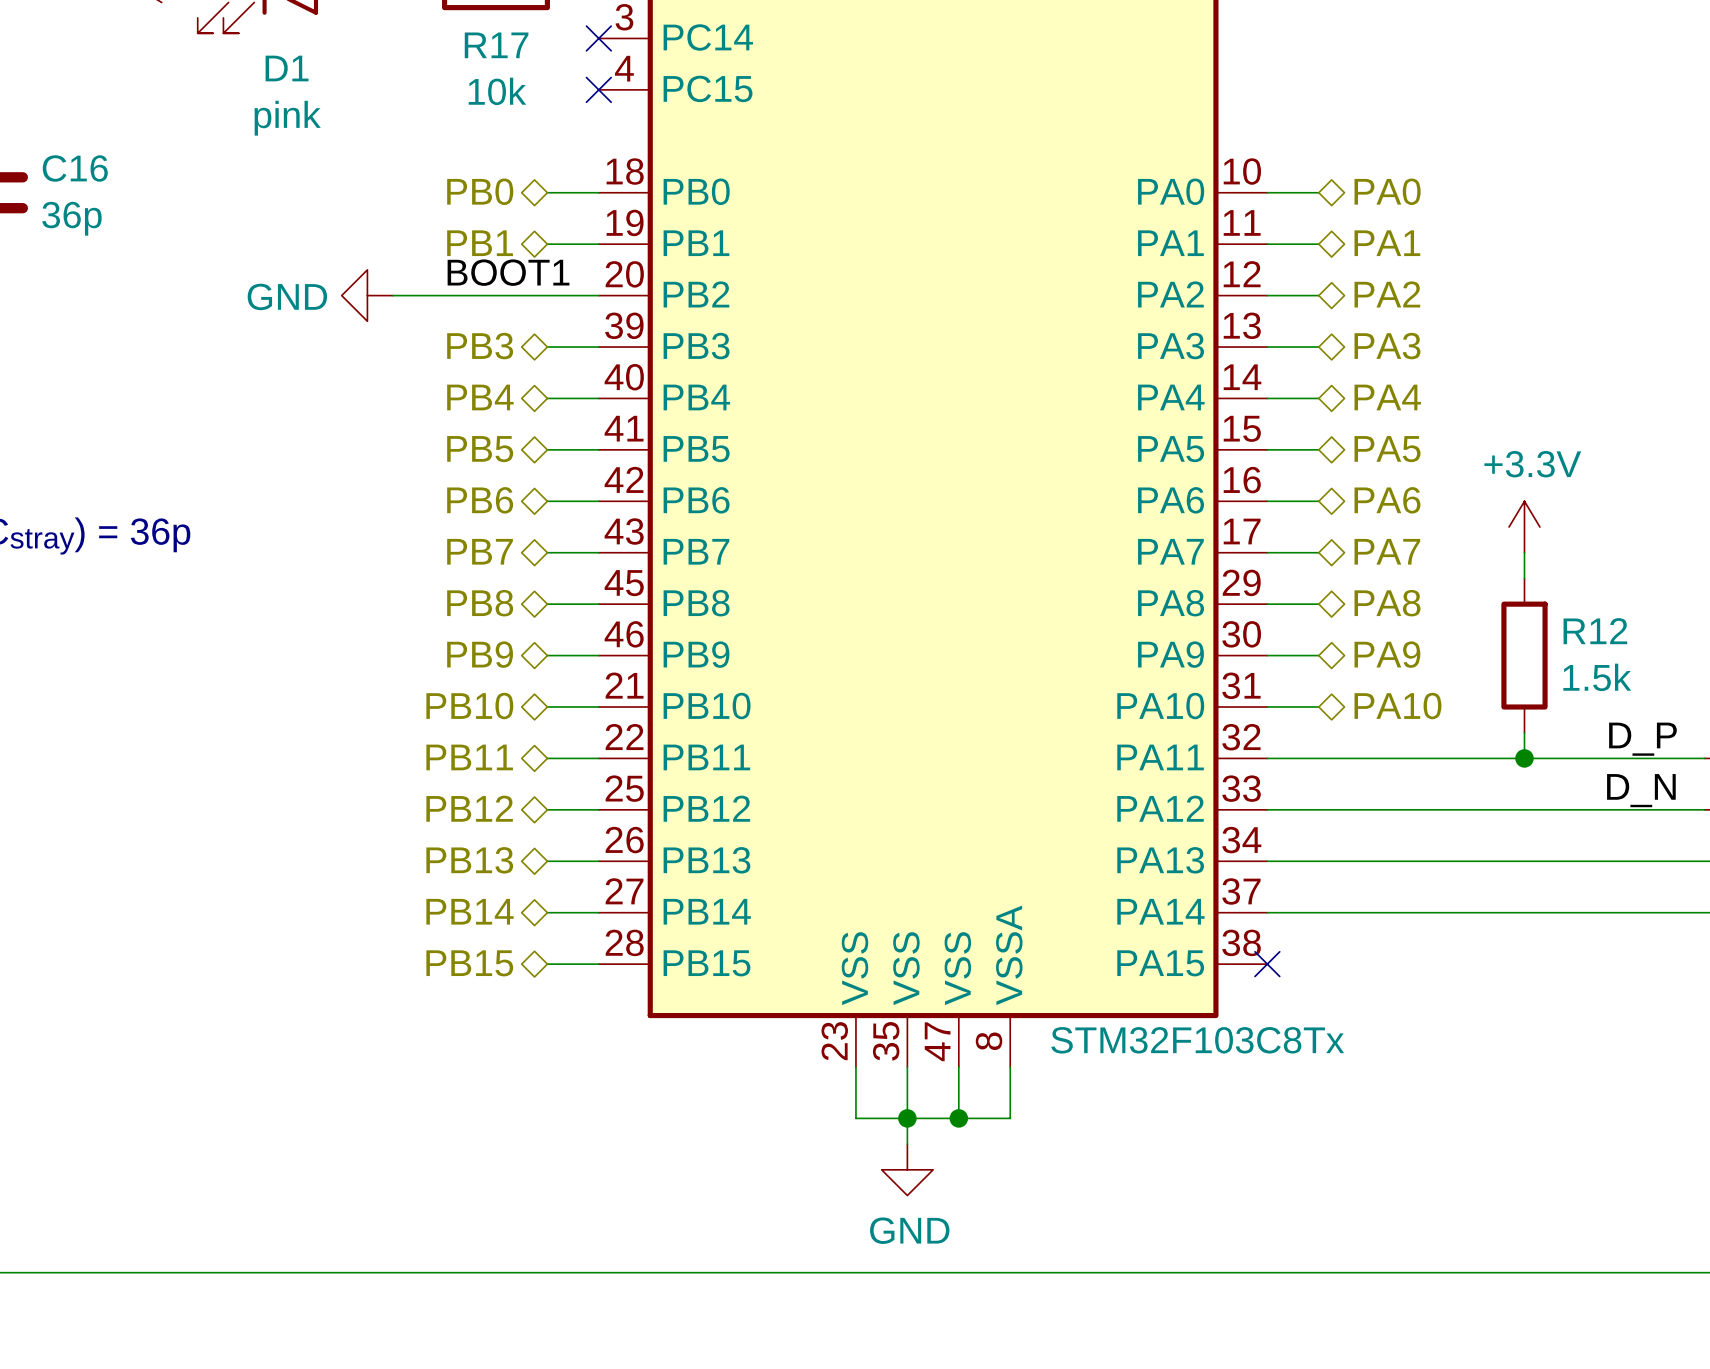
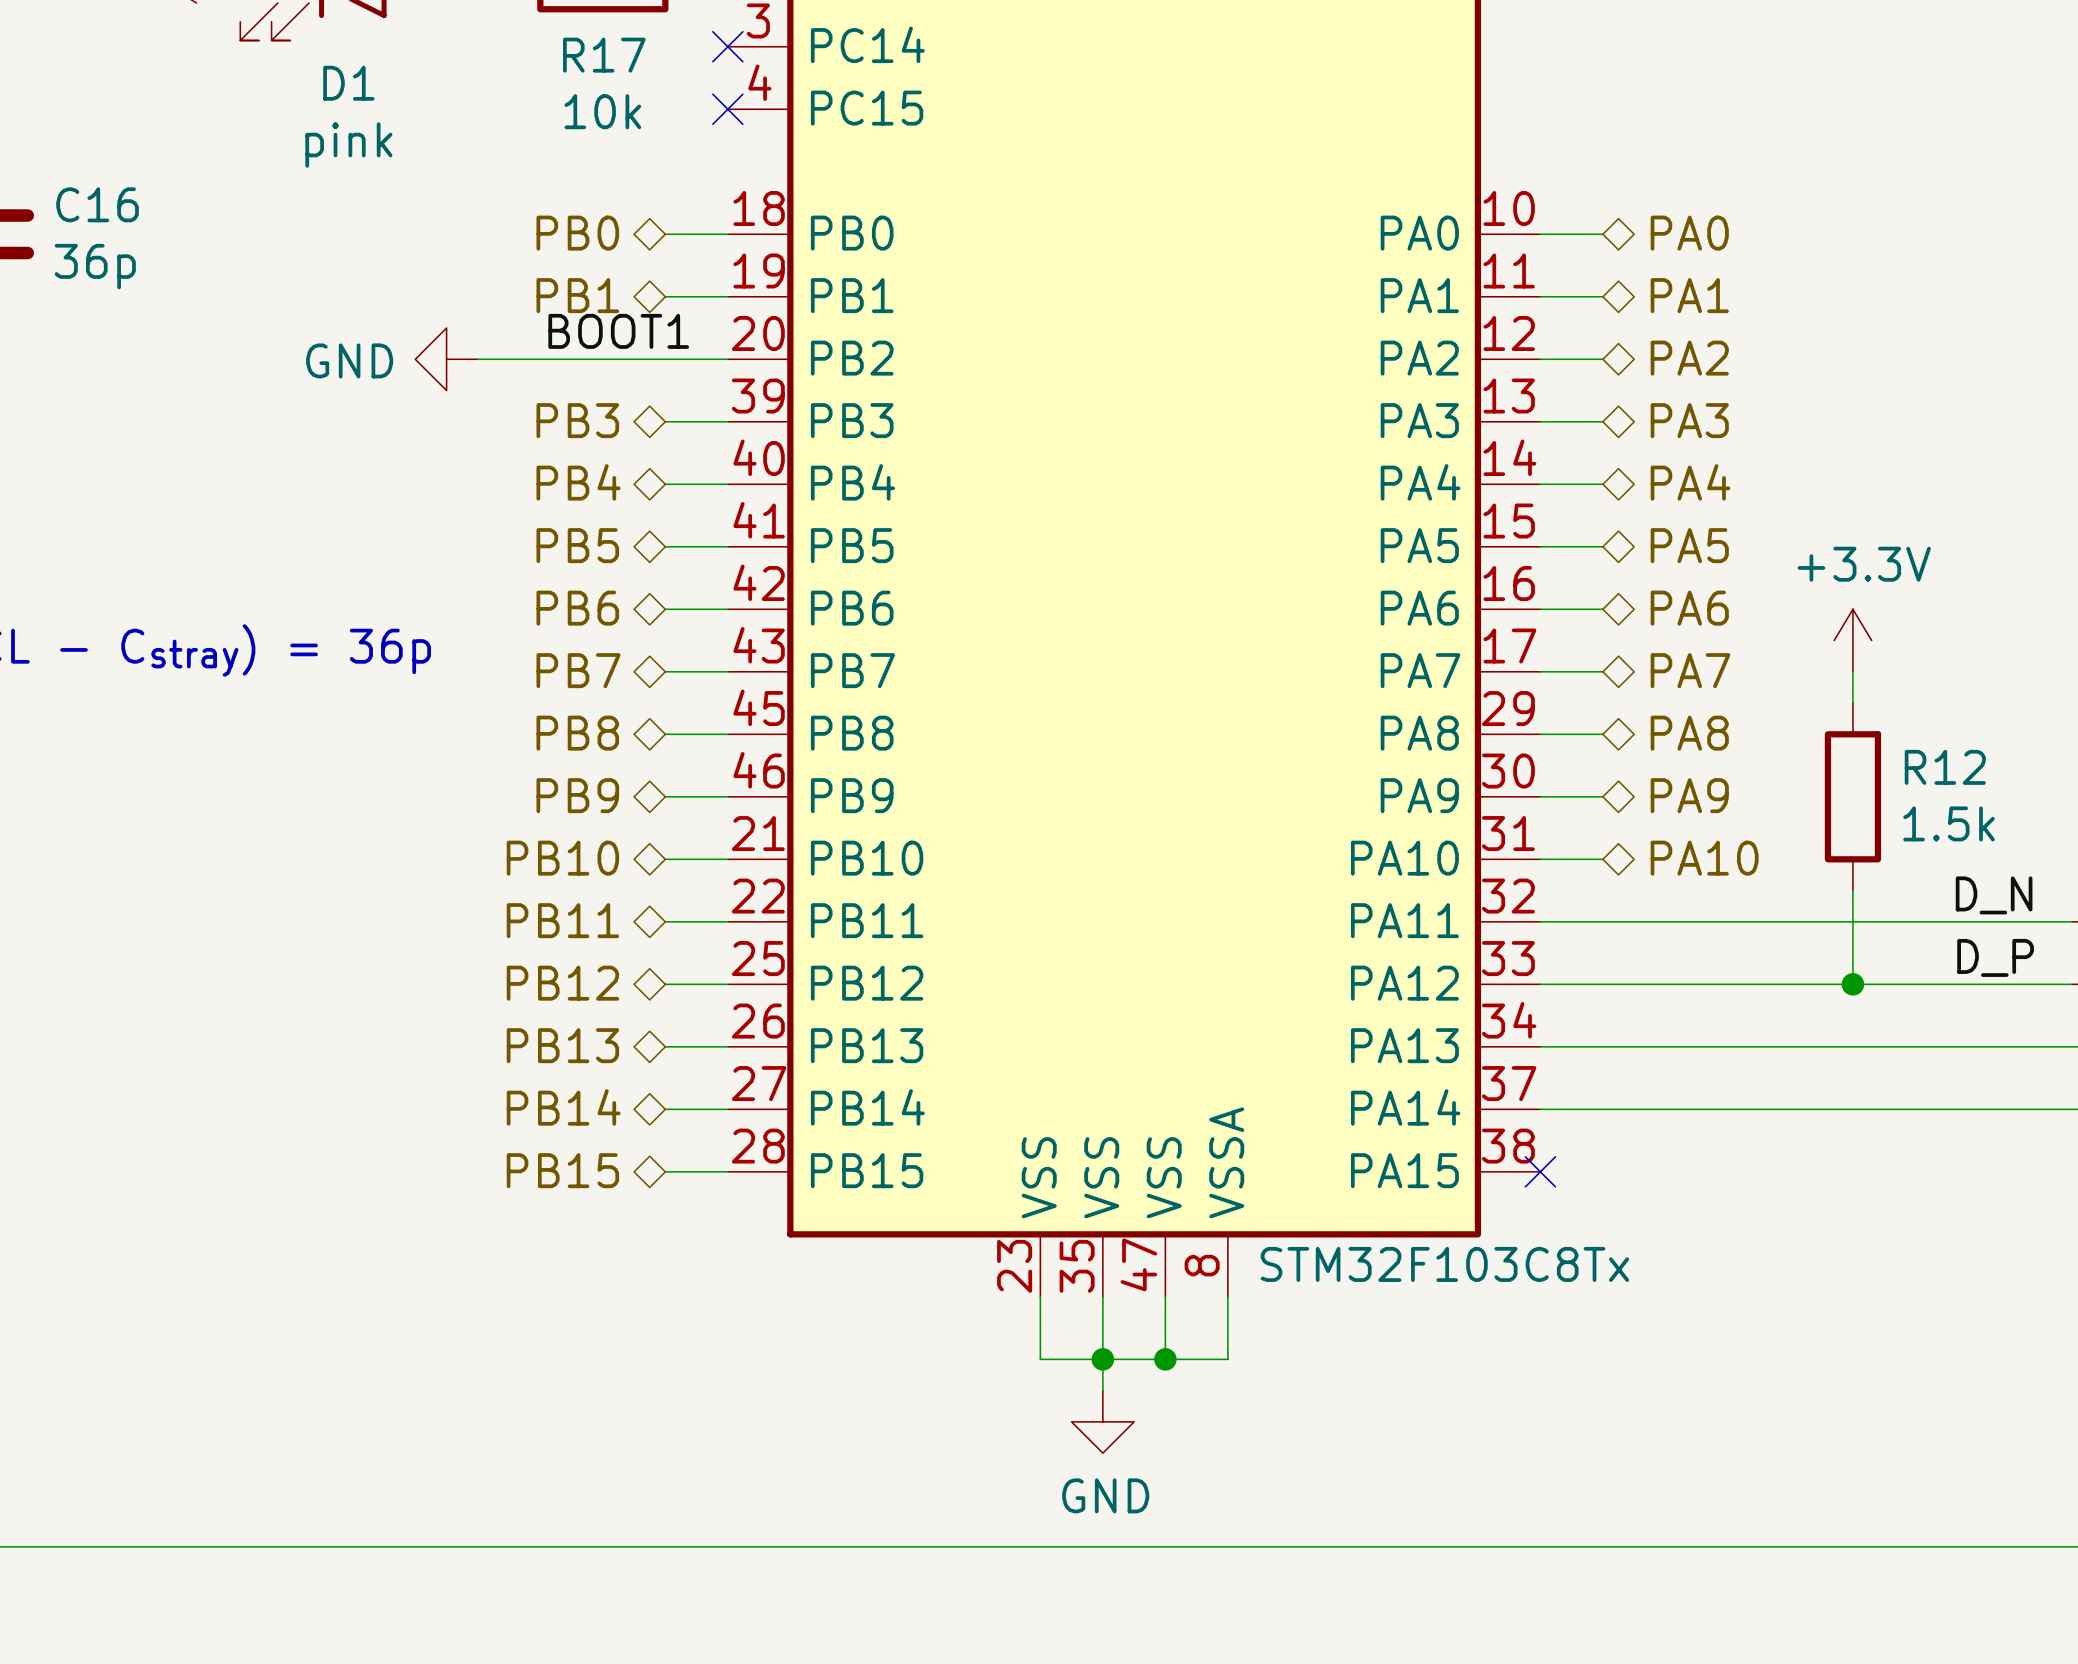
label: D_P (1642, 739) -> D_N (1994, 895)
wire: none -> (1852, 921) (1852, 984)
junction position: (1524, 758) -> (1852, 984)
label: D_N (1641, 790) -> D_P (1995, 957)

